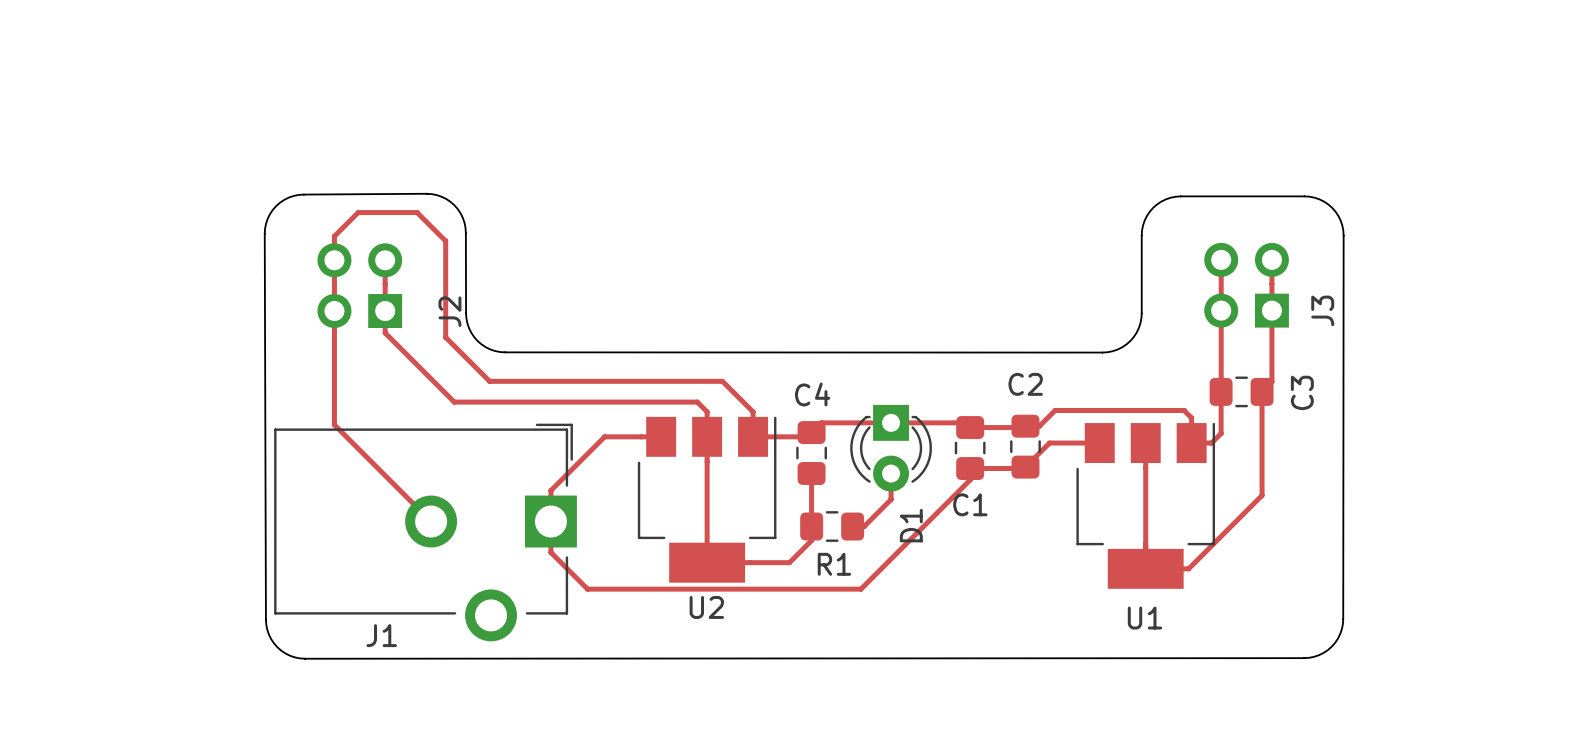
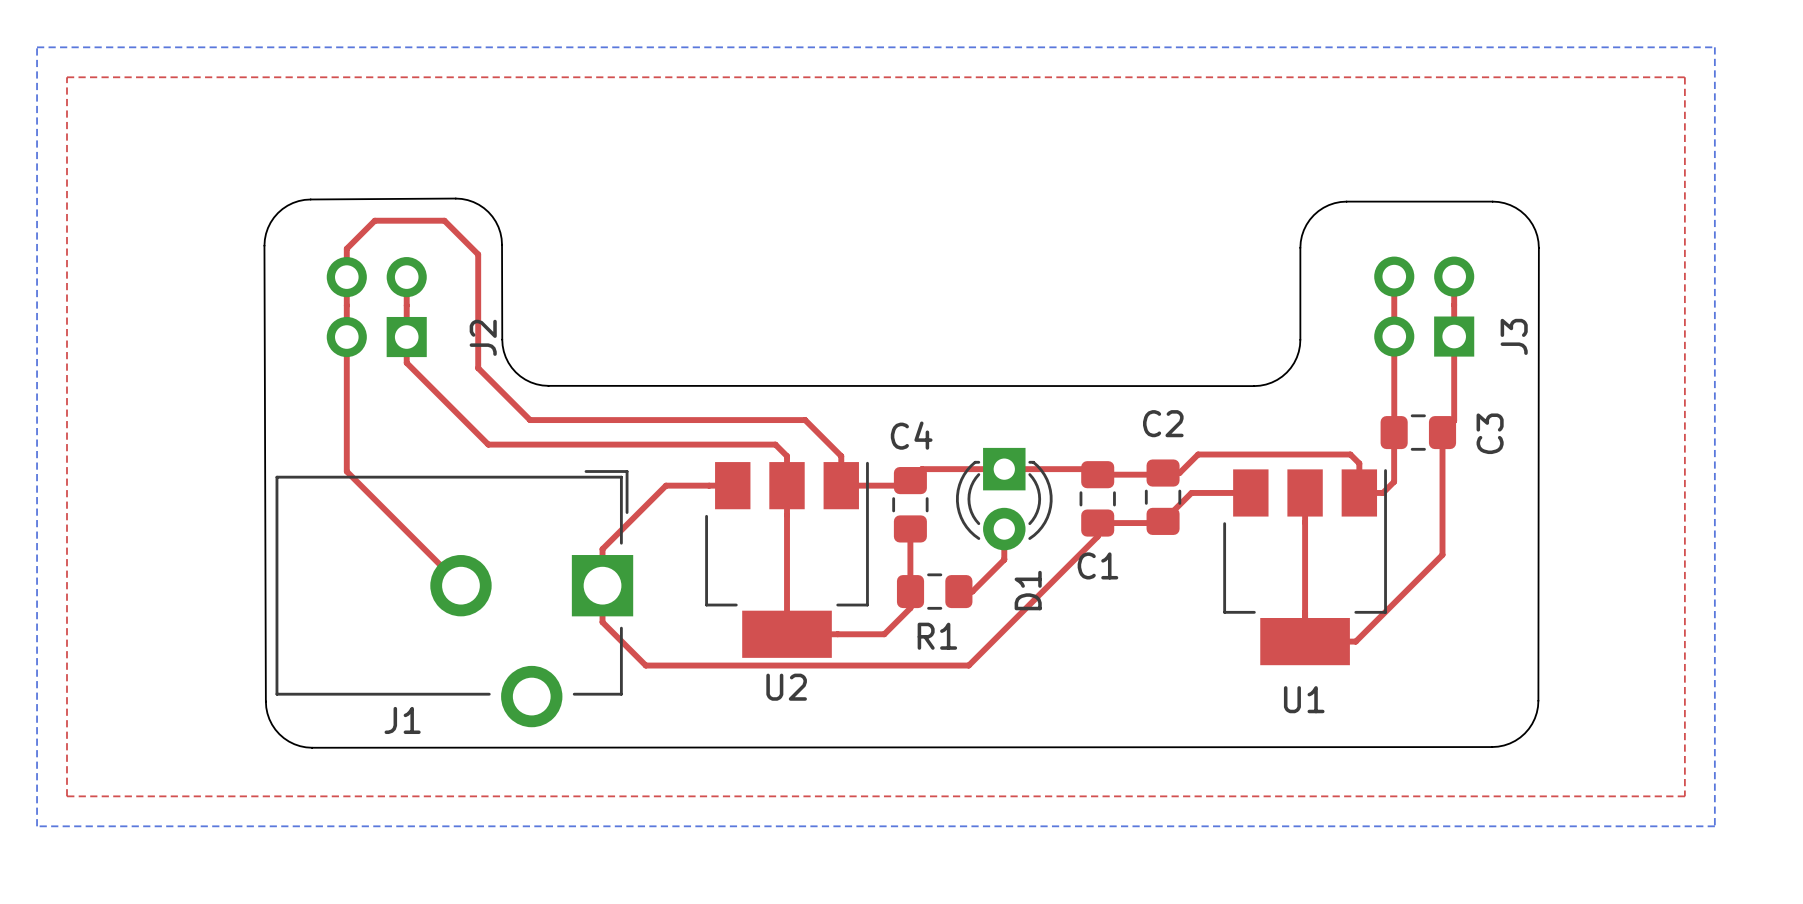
bottom zone outline: none -> (37, 47) (37, 826) (1714, 826) (1714, 47) (37, 47)
top zone outline: none -> (66, 77) (66, 796) (1684, 796) (1684, 77) (66, 77)

